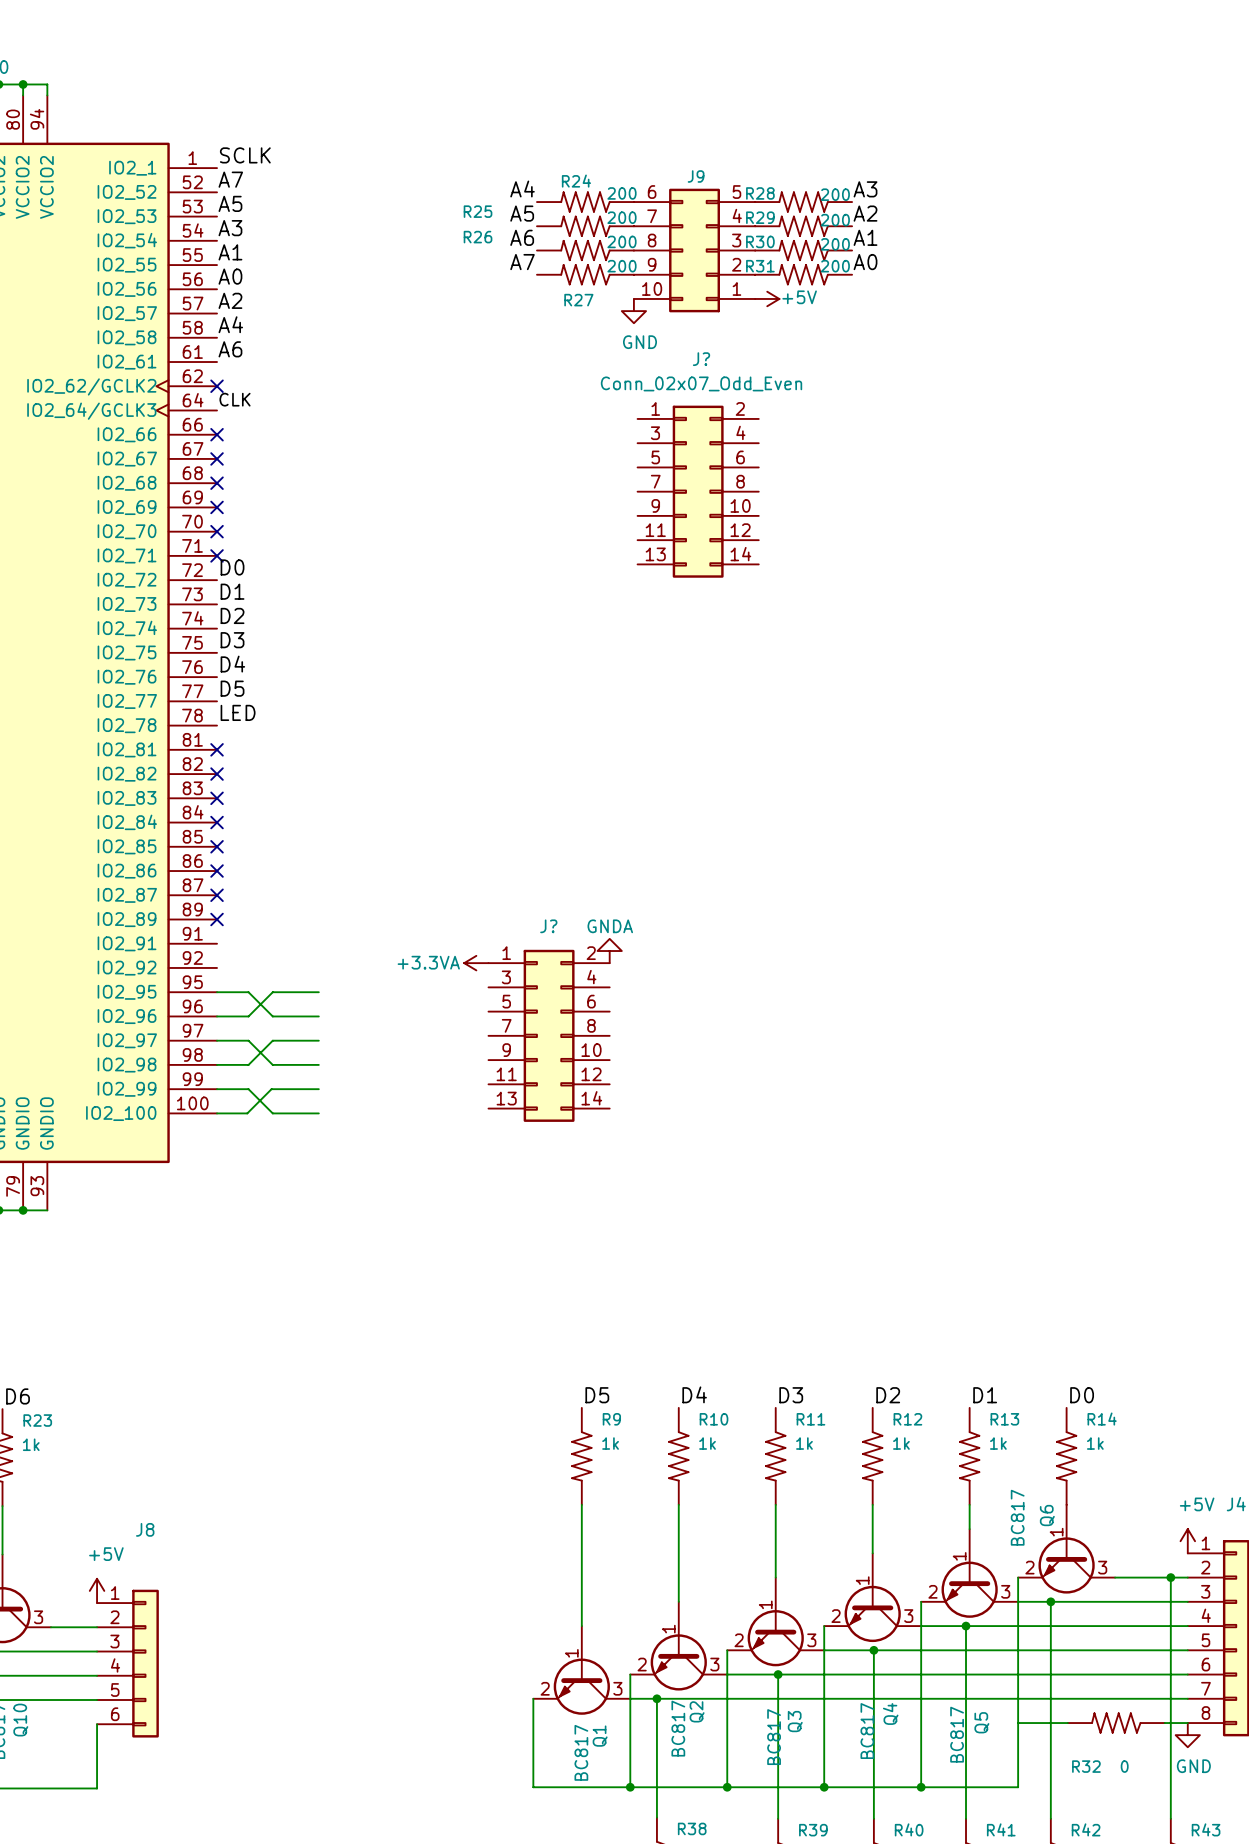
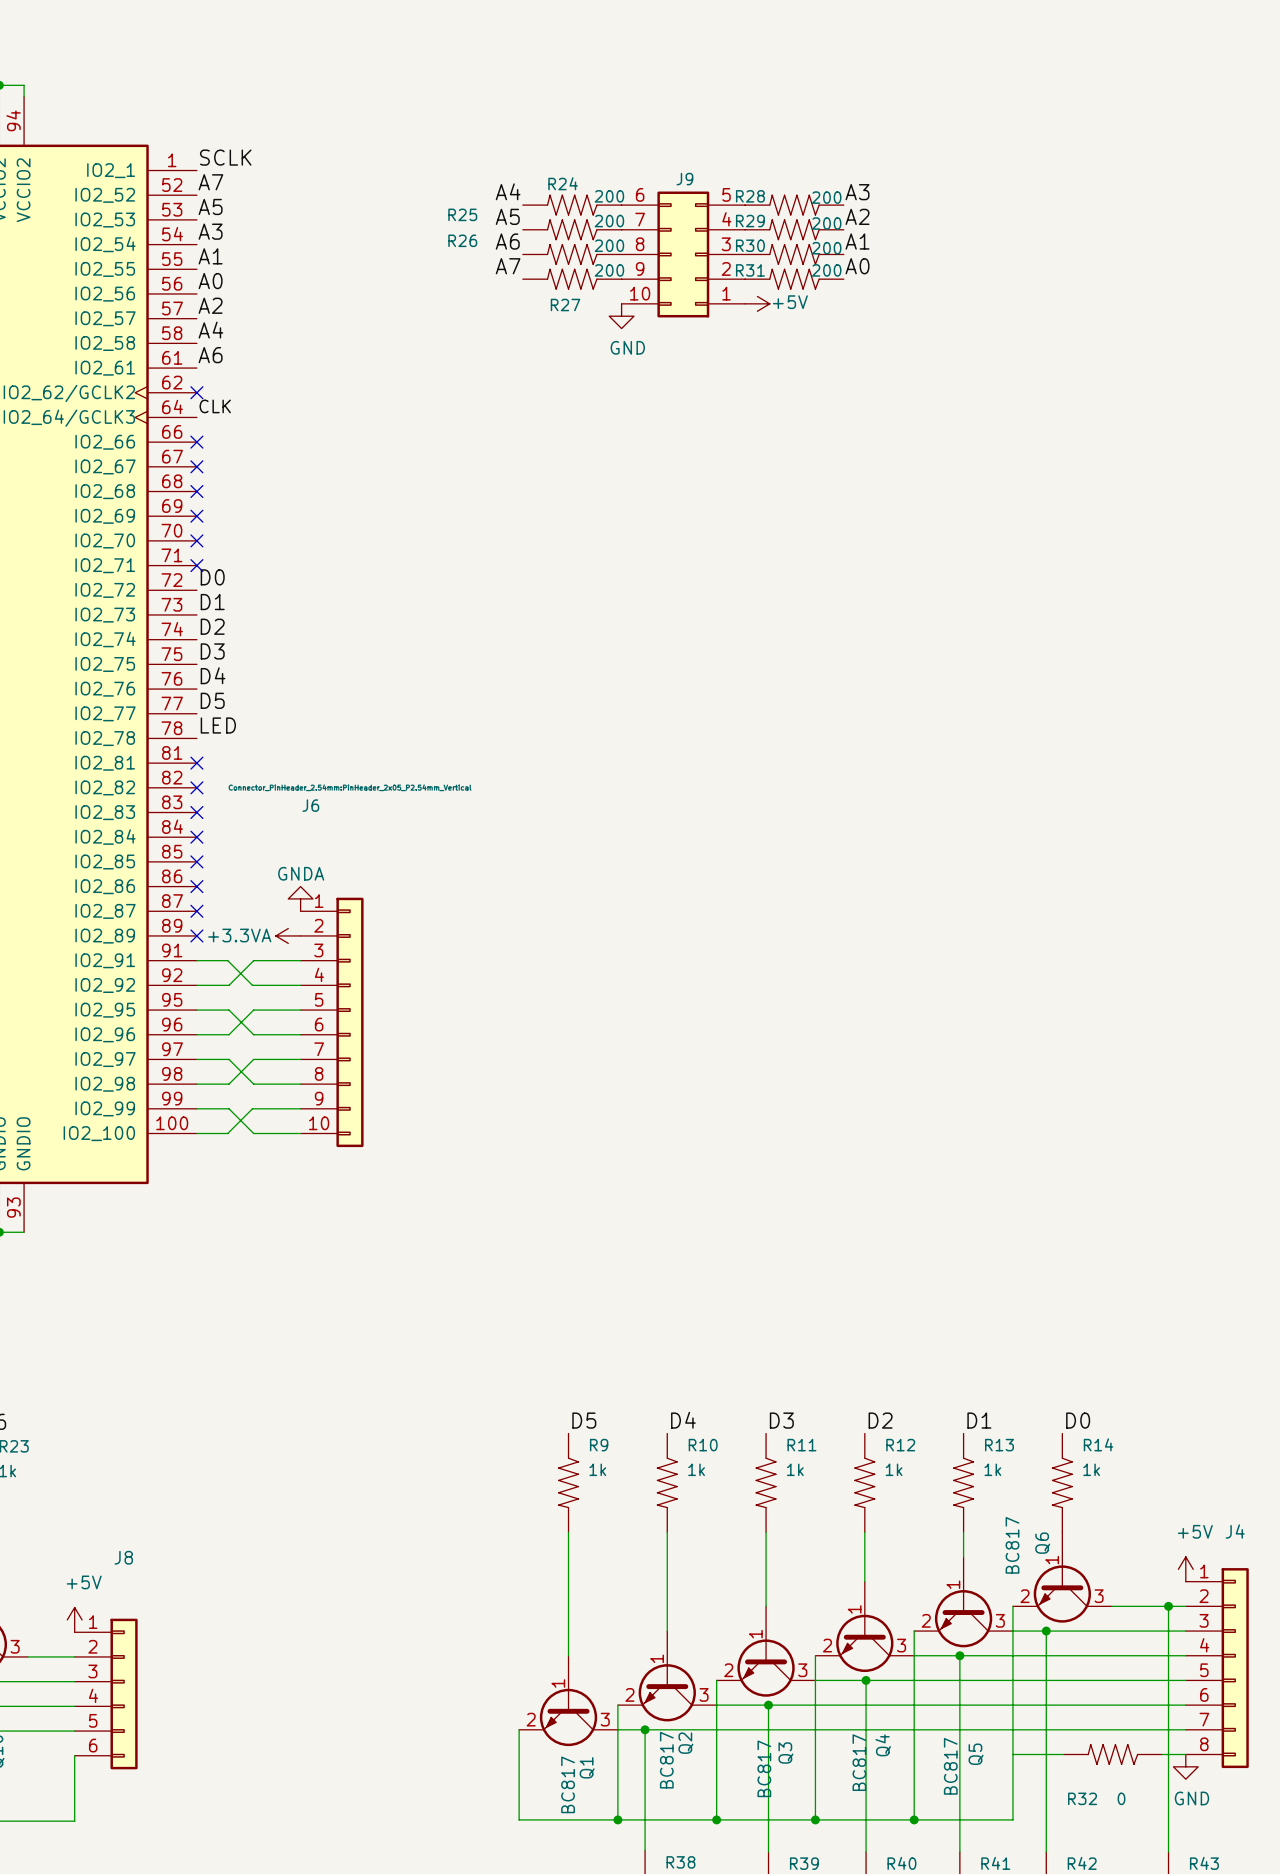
J?: Conn_02x07_Odd_Even (698, 491) -> none
power symbol: none -> GNDA (300, 898)
wire: none -> (196, 960) (227, 960) (252, 985) (300, 985)
wire: none -> (300, 960) (253, 960) (229, 985) (196, 985)
power symbol: GNDA (609, 951) -> none
power symbol position: +3.3VA (476, 963) -> +3.3VA (288, 935)
J6: none -> (332, 1022)
J?: (549, 1035) -> none

